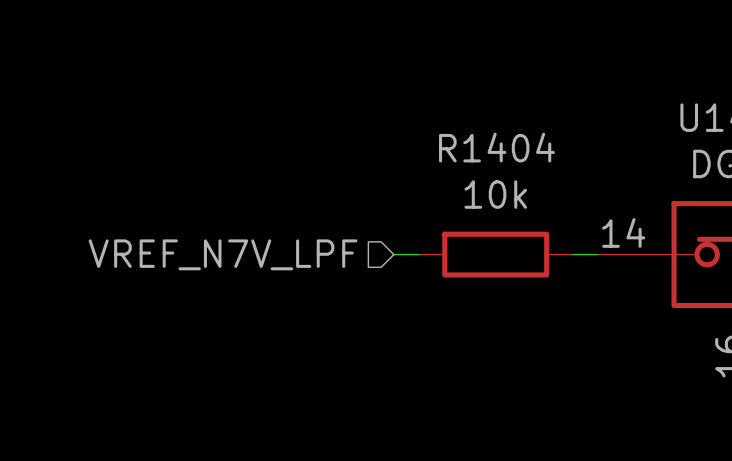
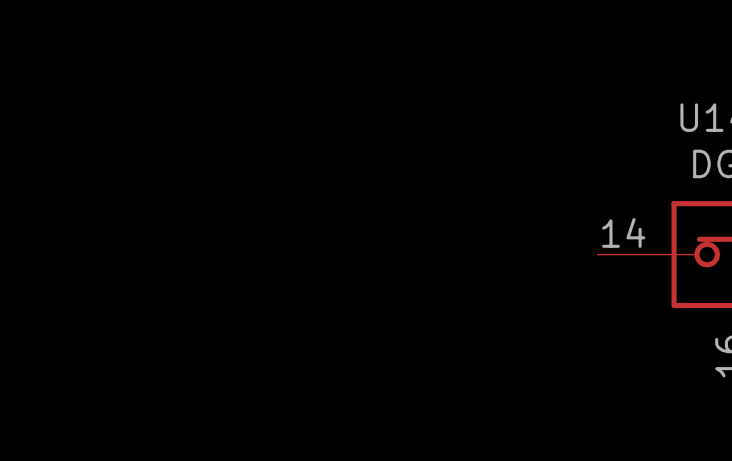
hierarchical label: VREF_N7V_LPF (223, 254) -> none
wire: (393, 254) (419, 254) -> none
R1404: 10k (495, 254) -> none
wire: (572, 254) (597, 254) -> none

